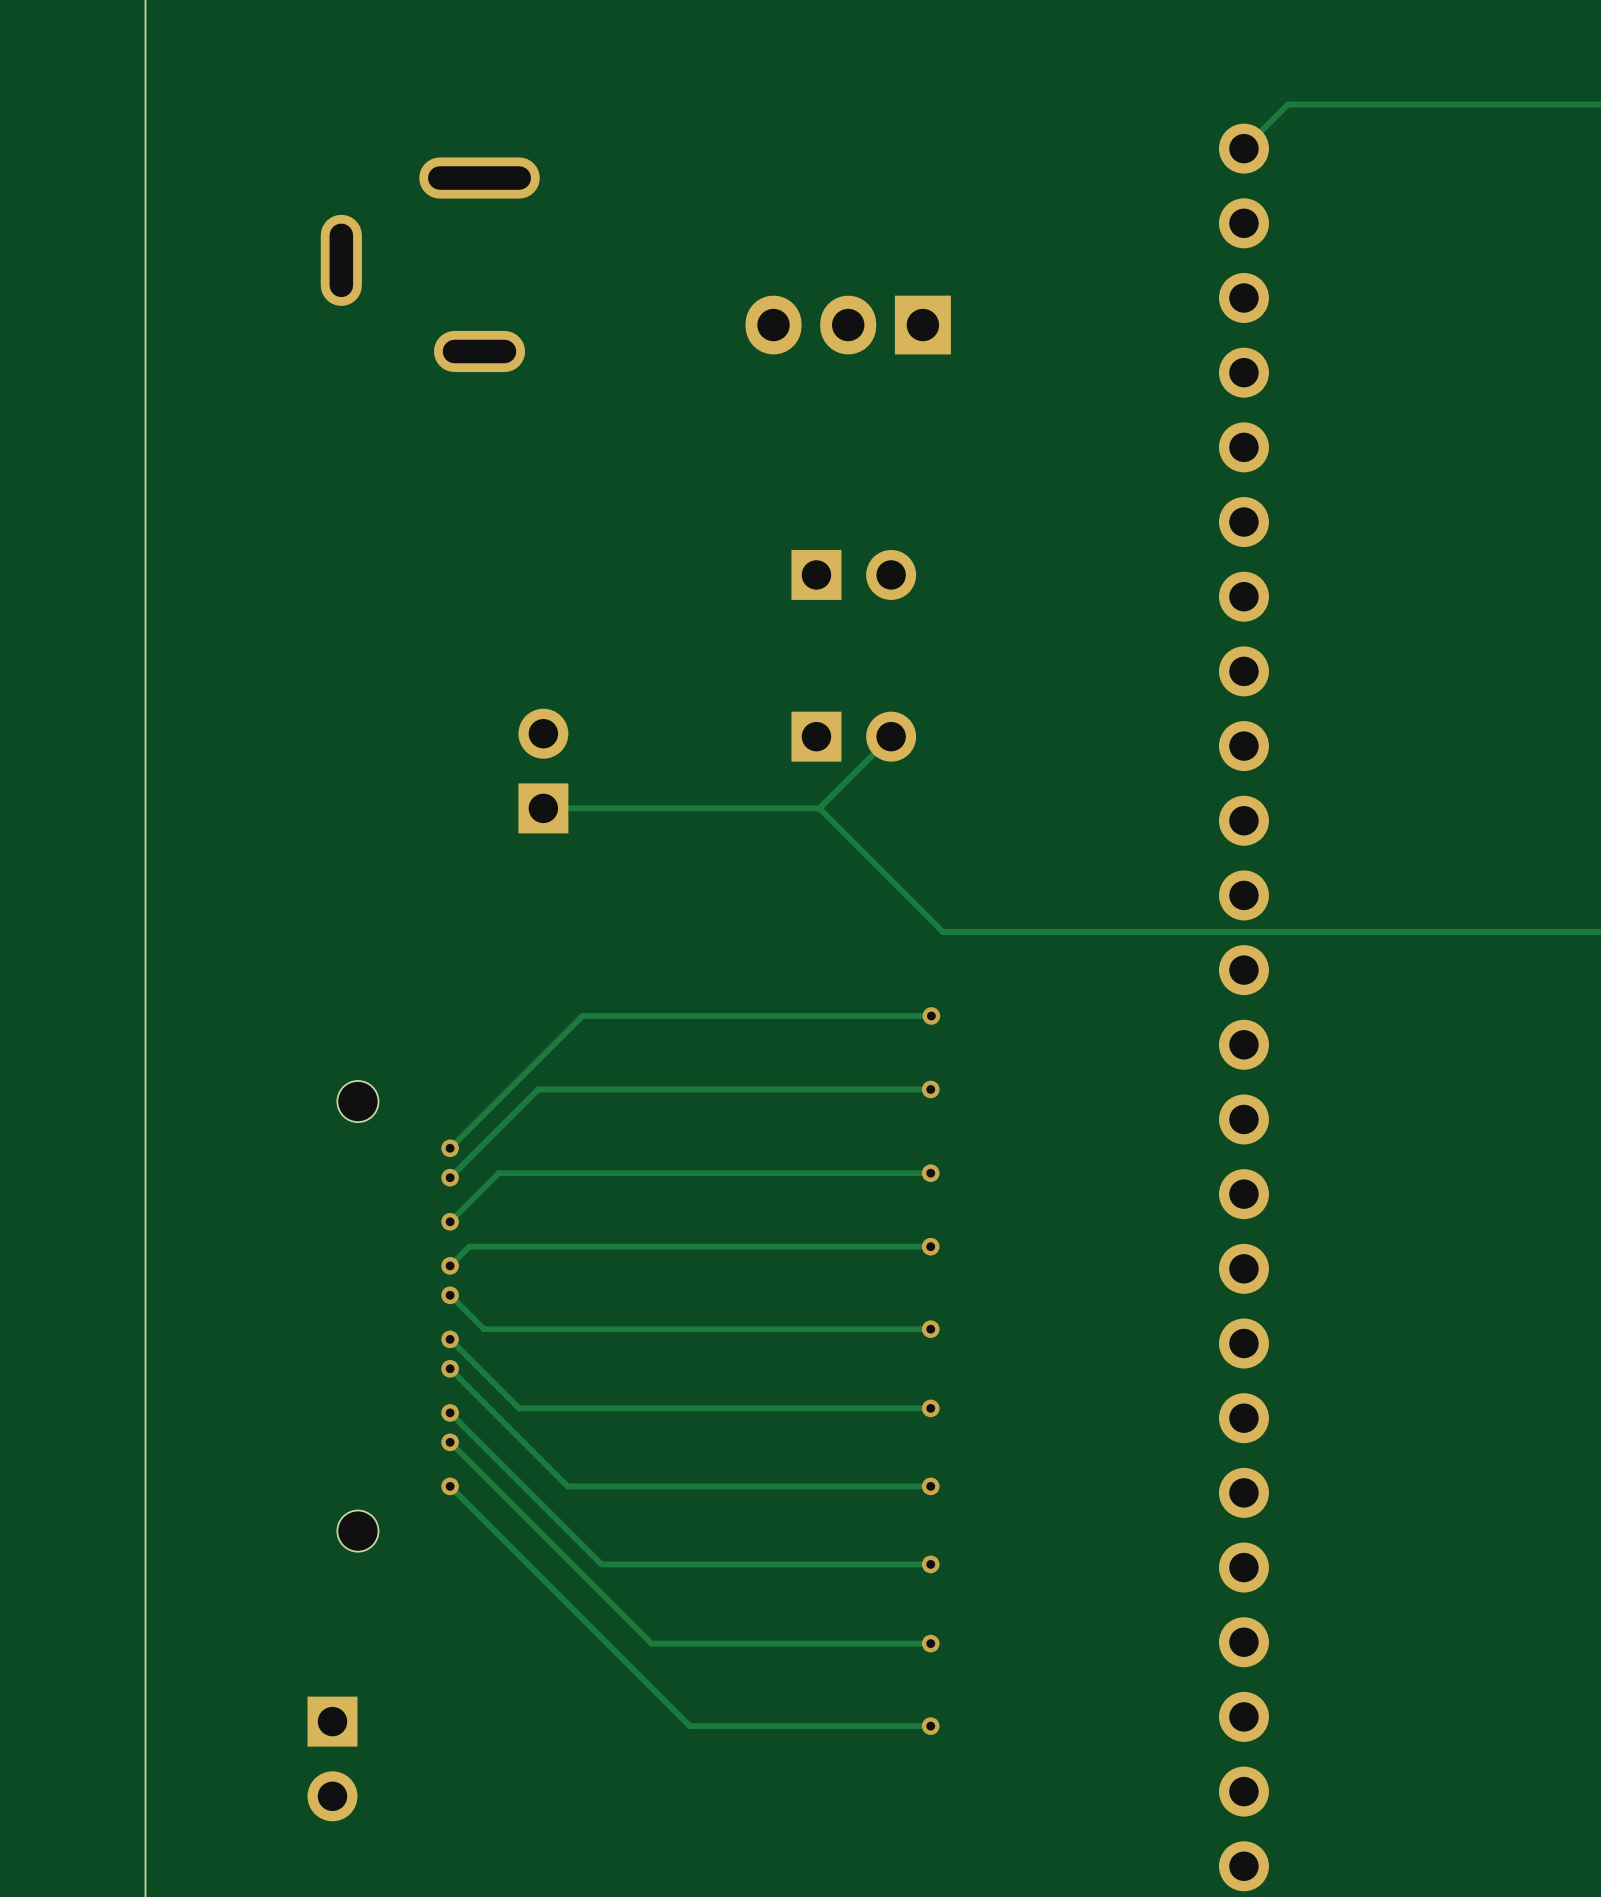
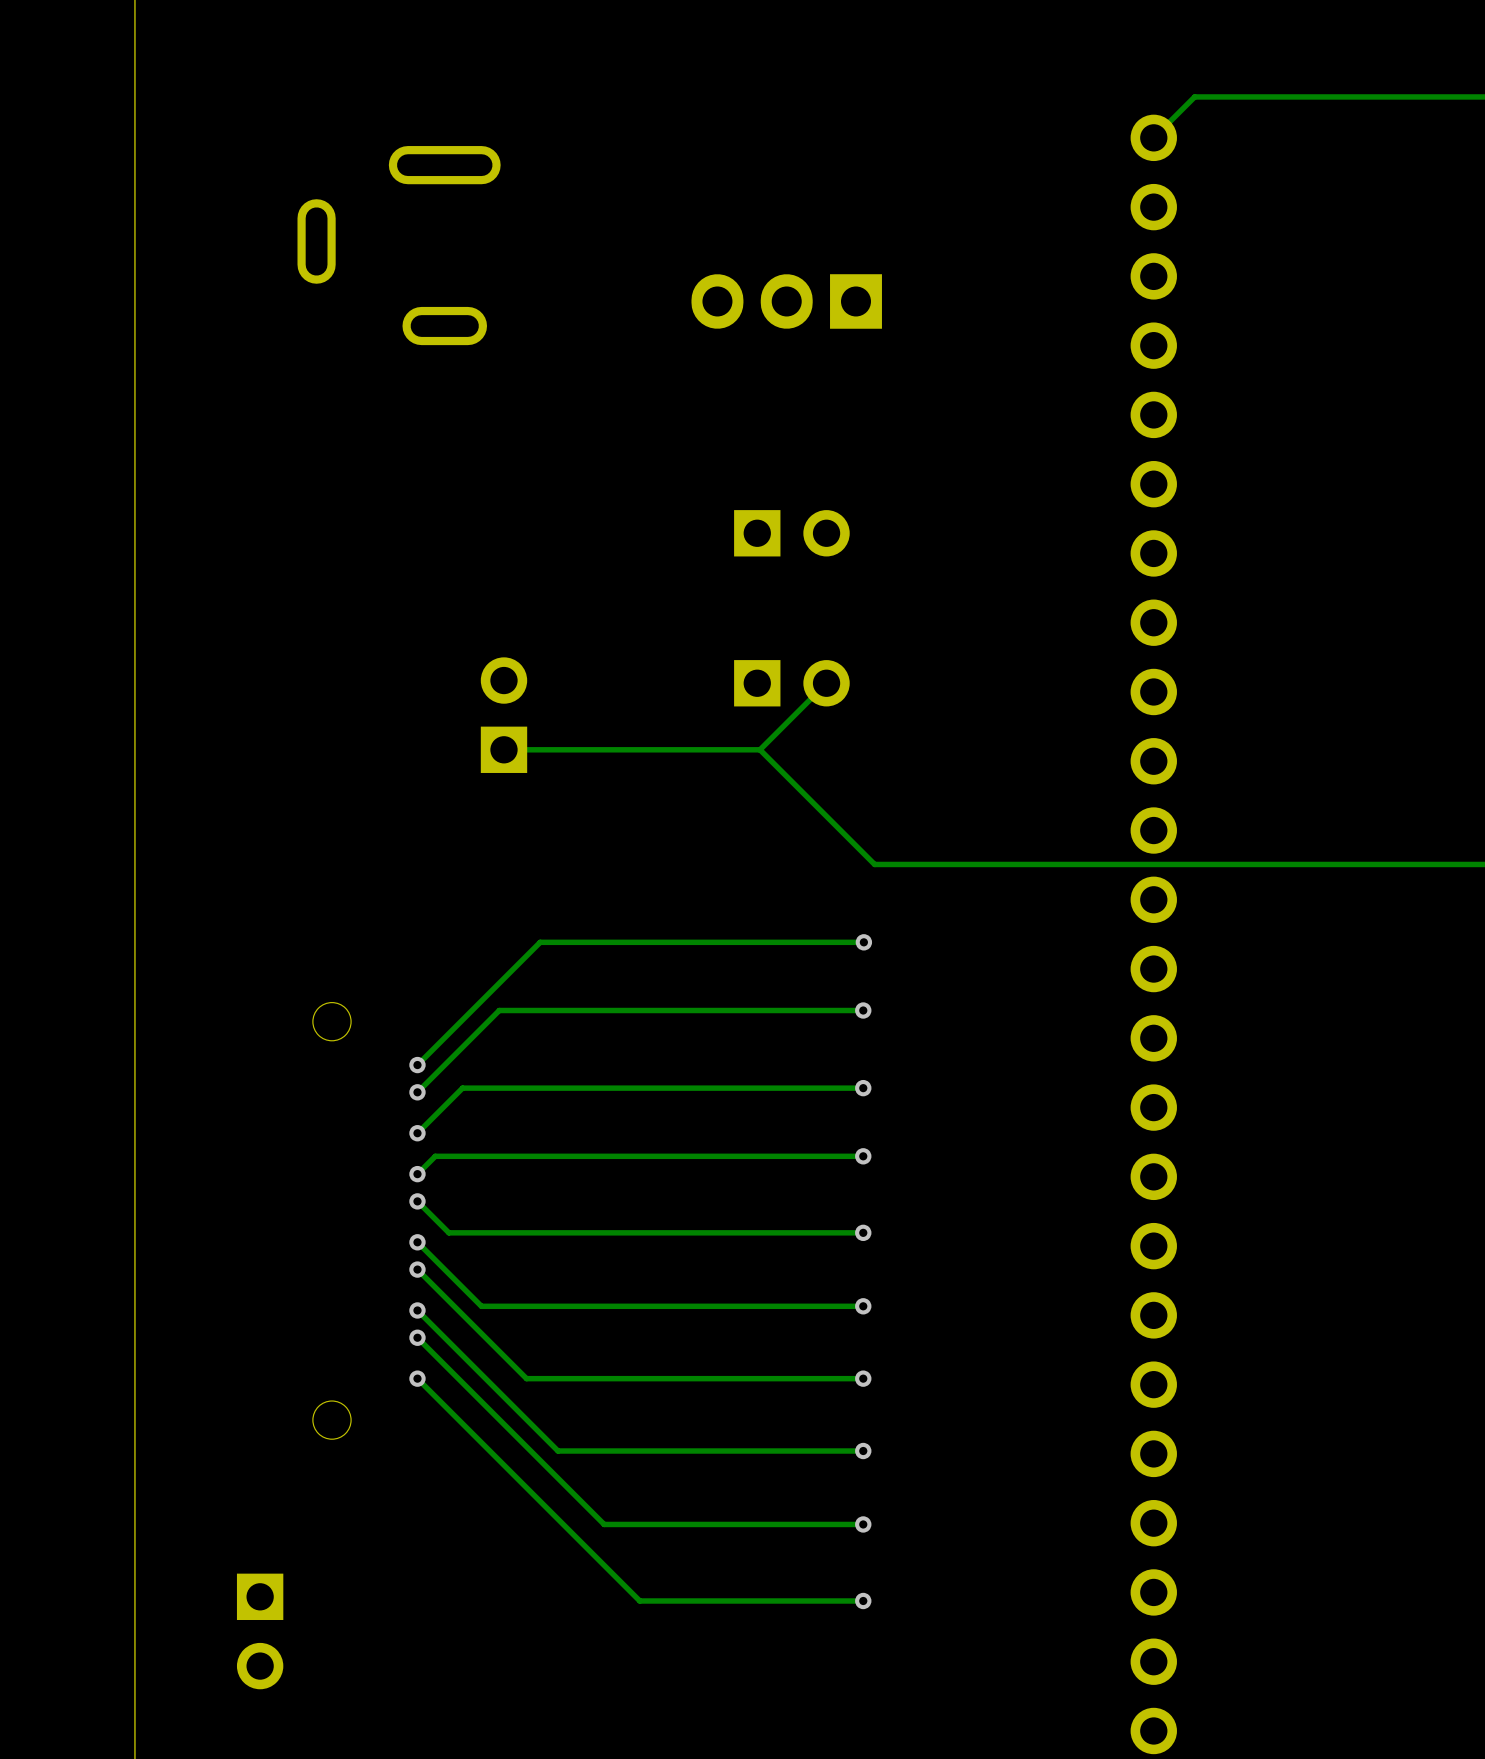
part position: (332, 1758) -> (260, 1631)

